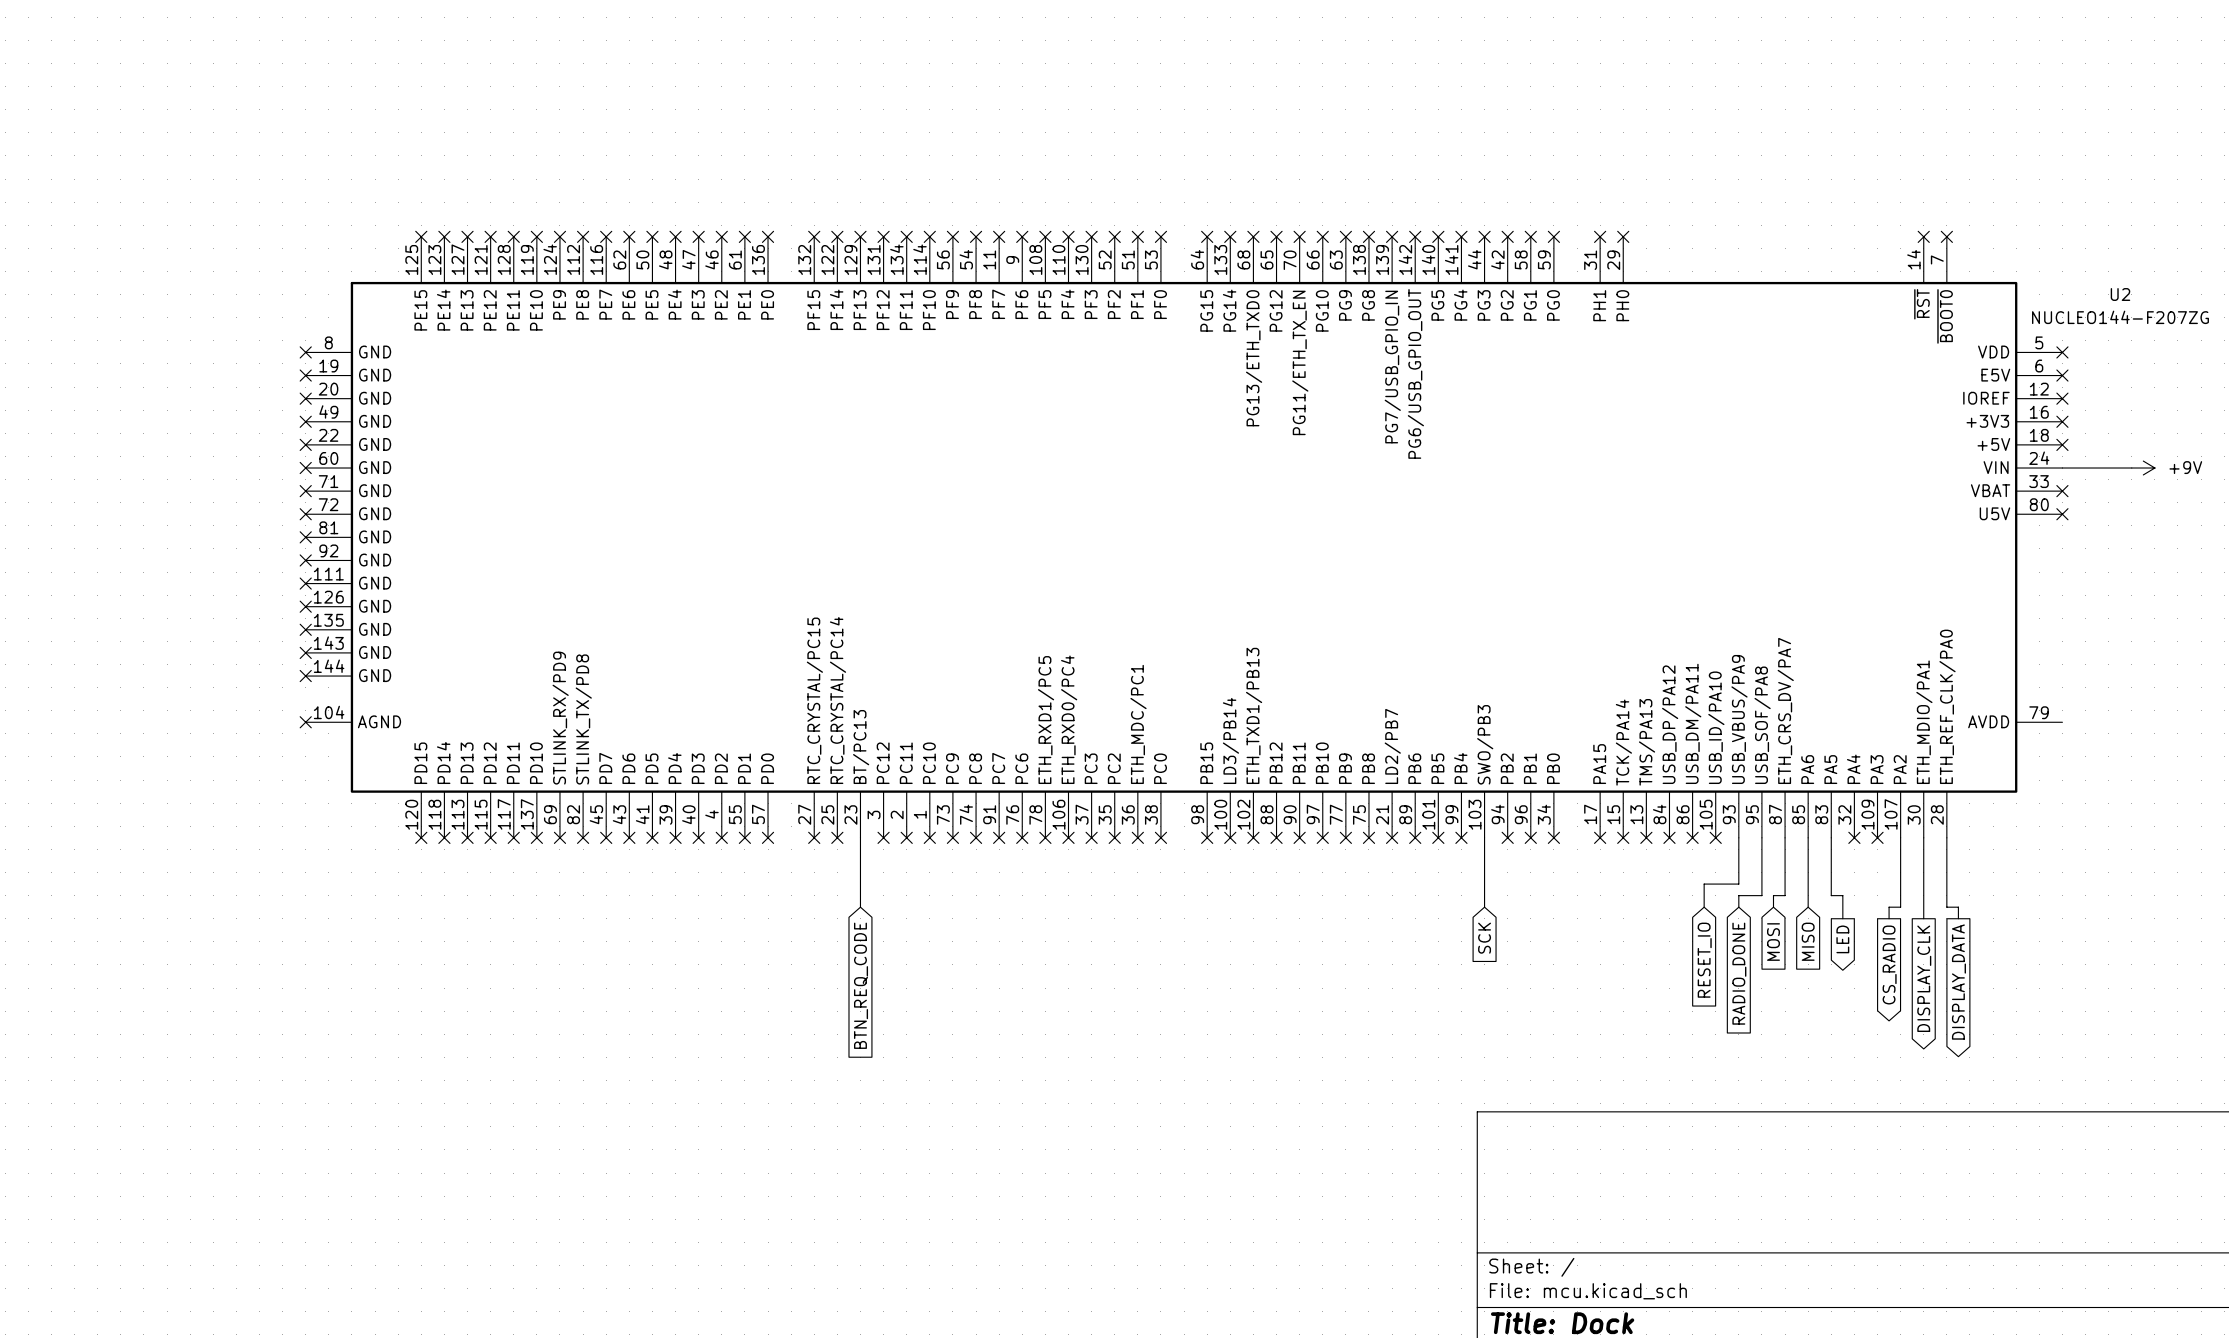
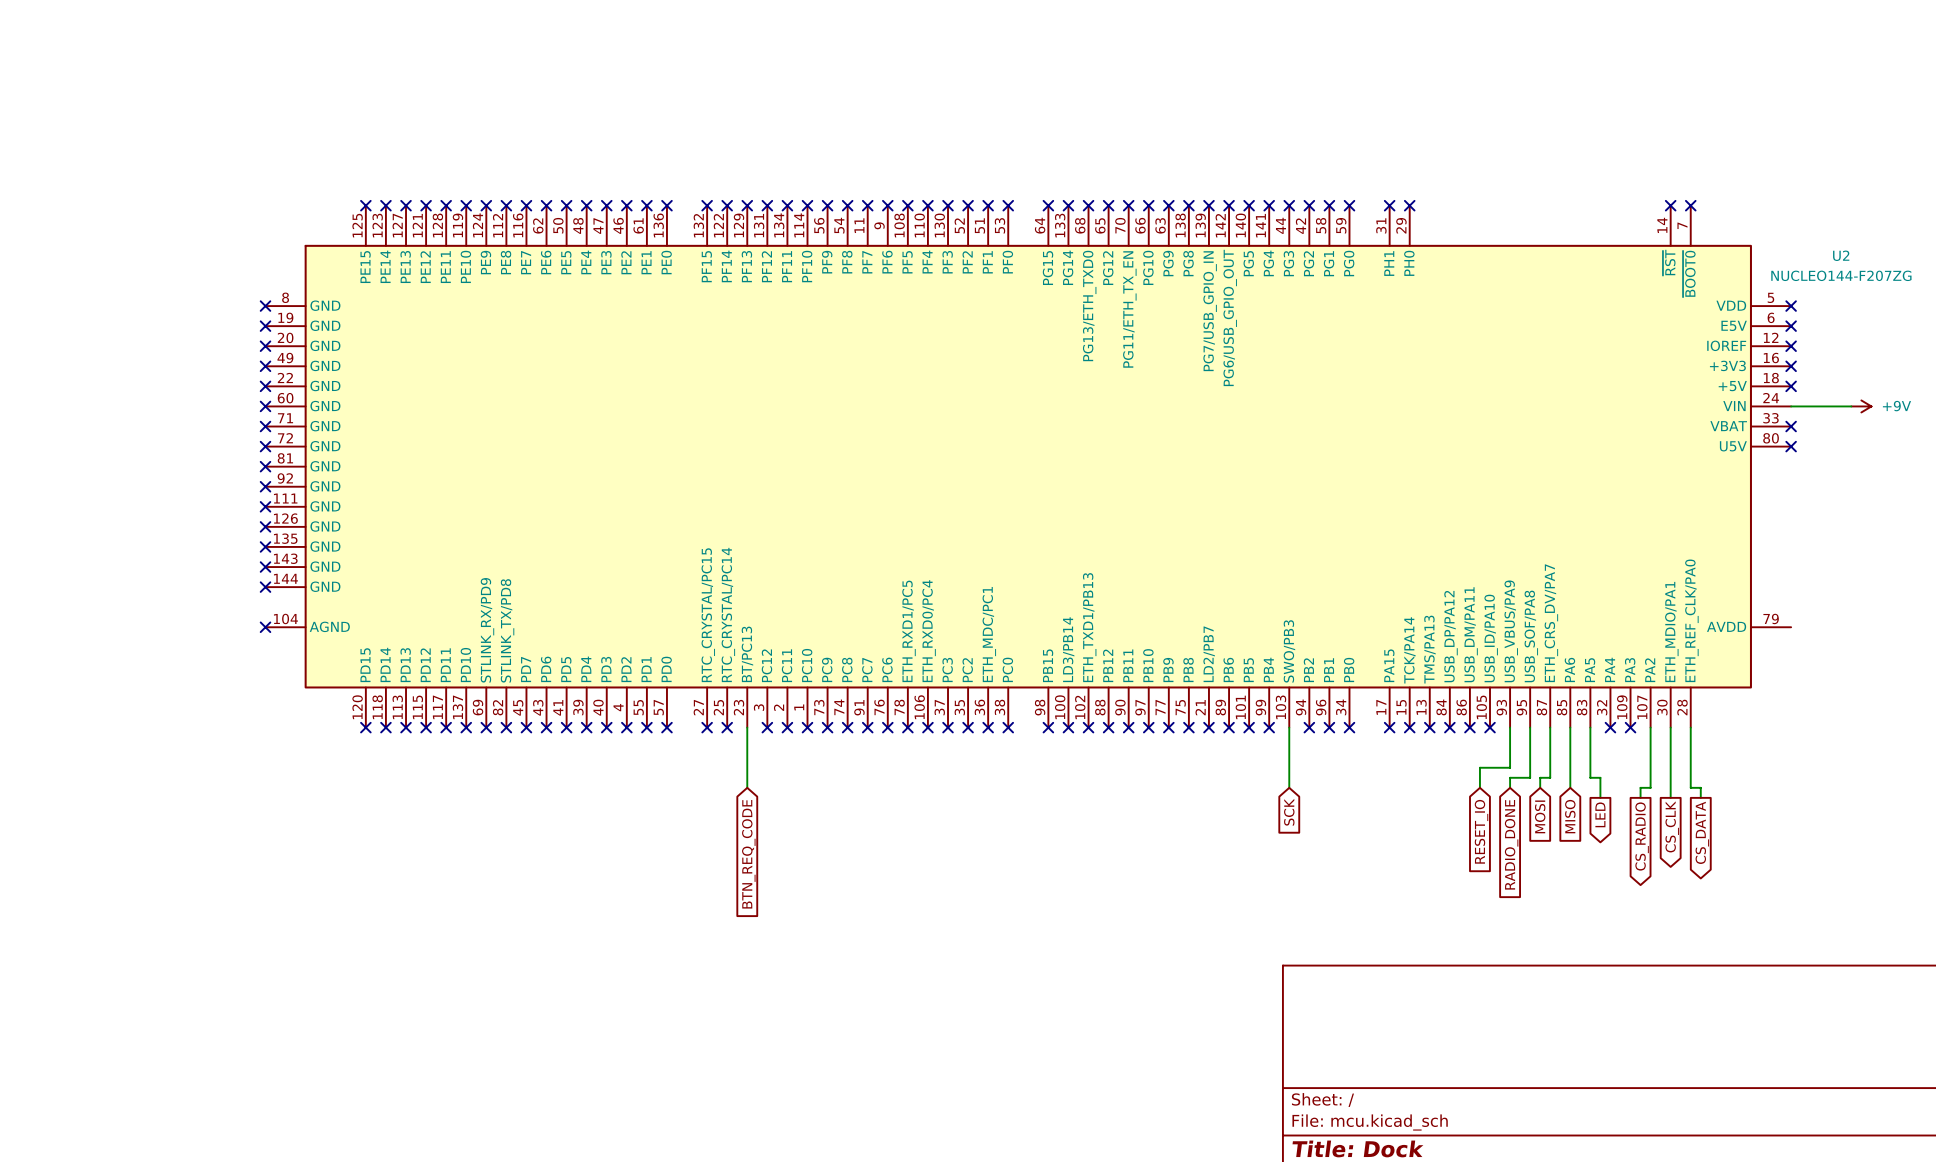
global label: DISPLAY_CLK (1924, 978) -> CS_CLK (1672, 826)
global label: DISPLAY_DATA (1958, 982) -> CS_DATA (1702, 832)

